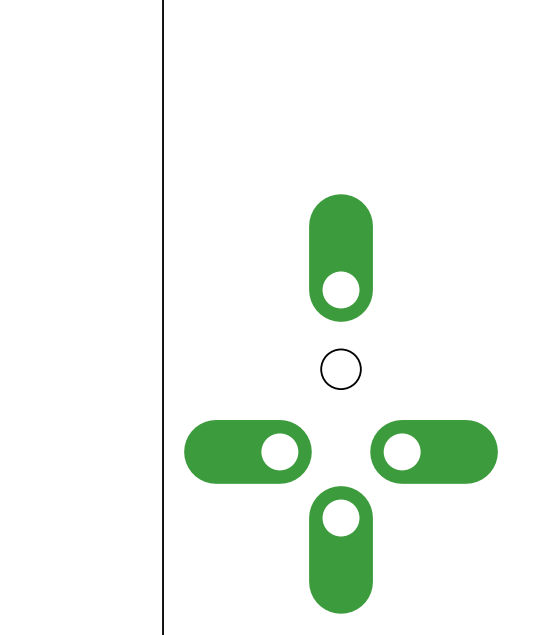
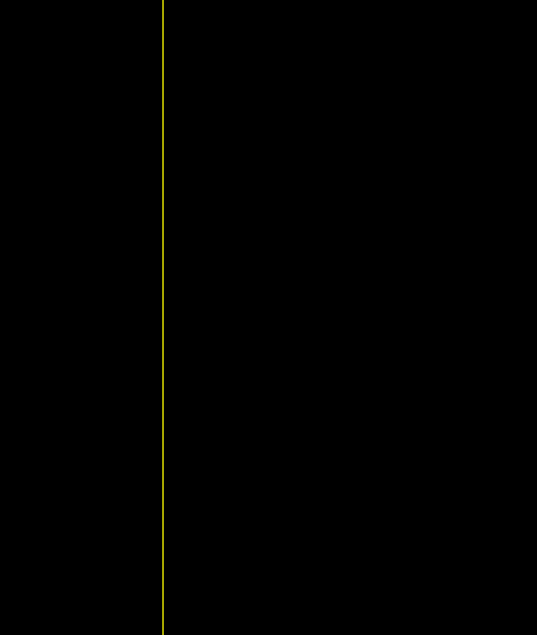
part: (341, 403) -> none

